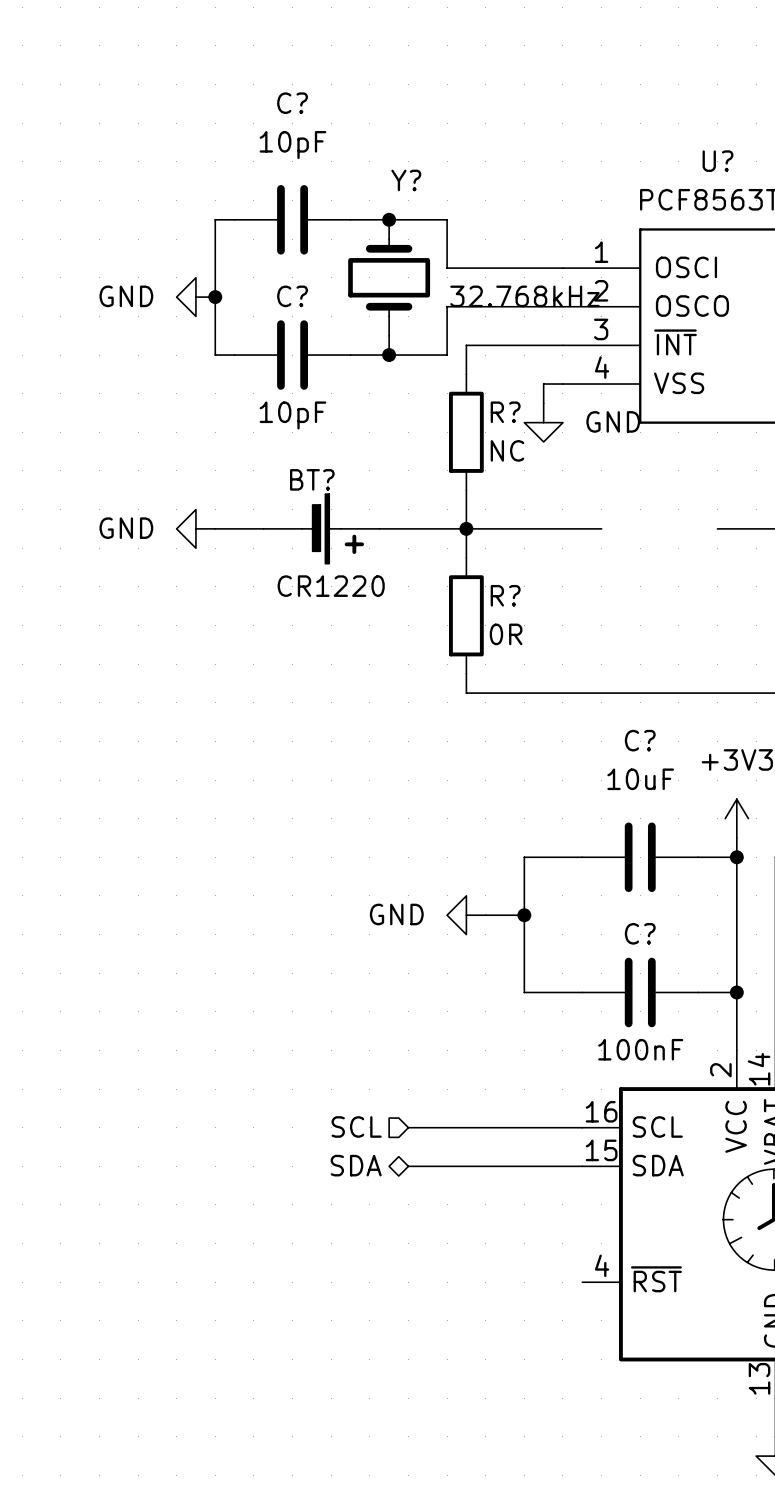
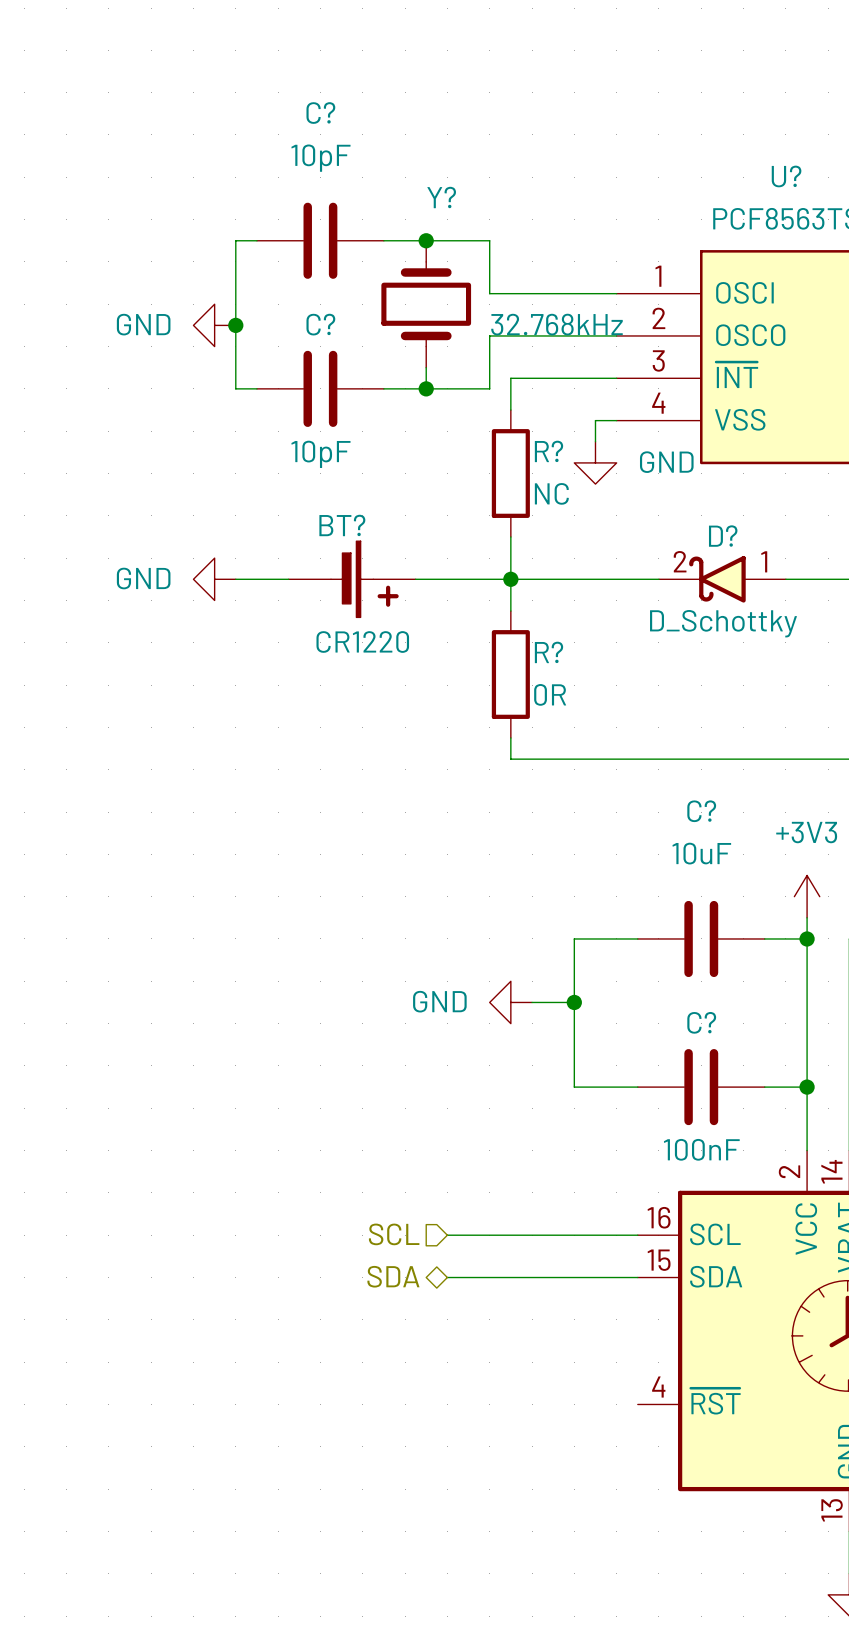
D?: none -> D_Schottky (722, 579)

